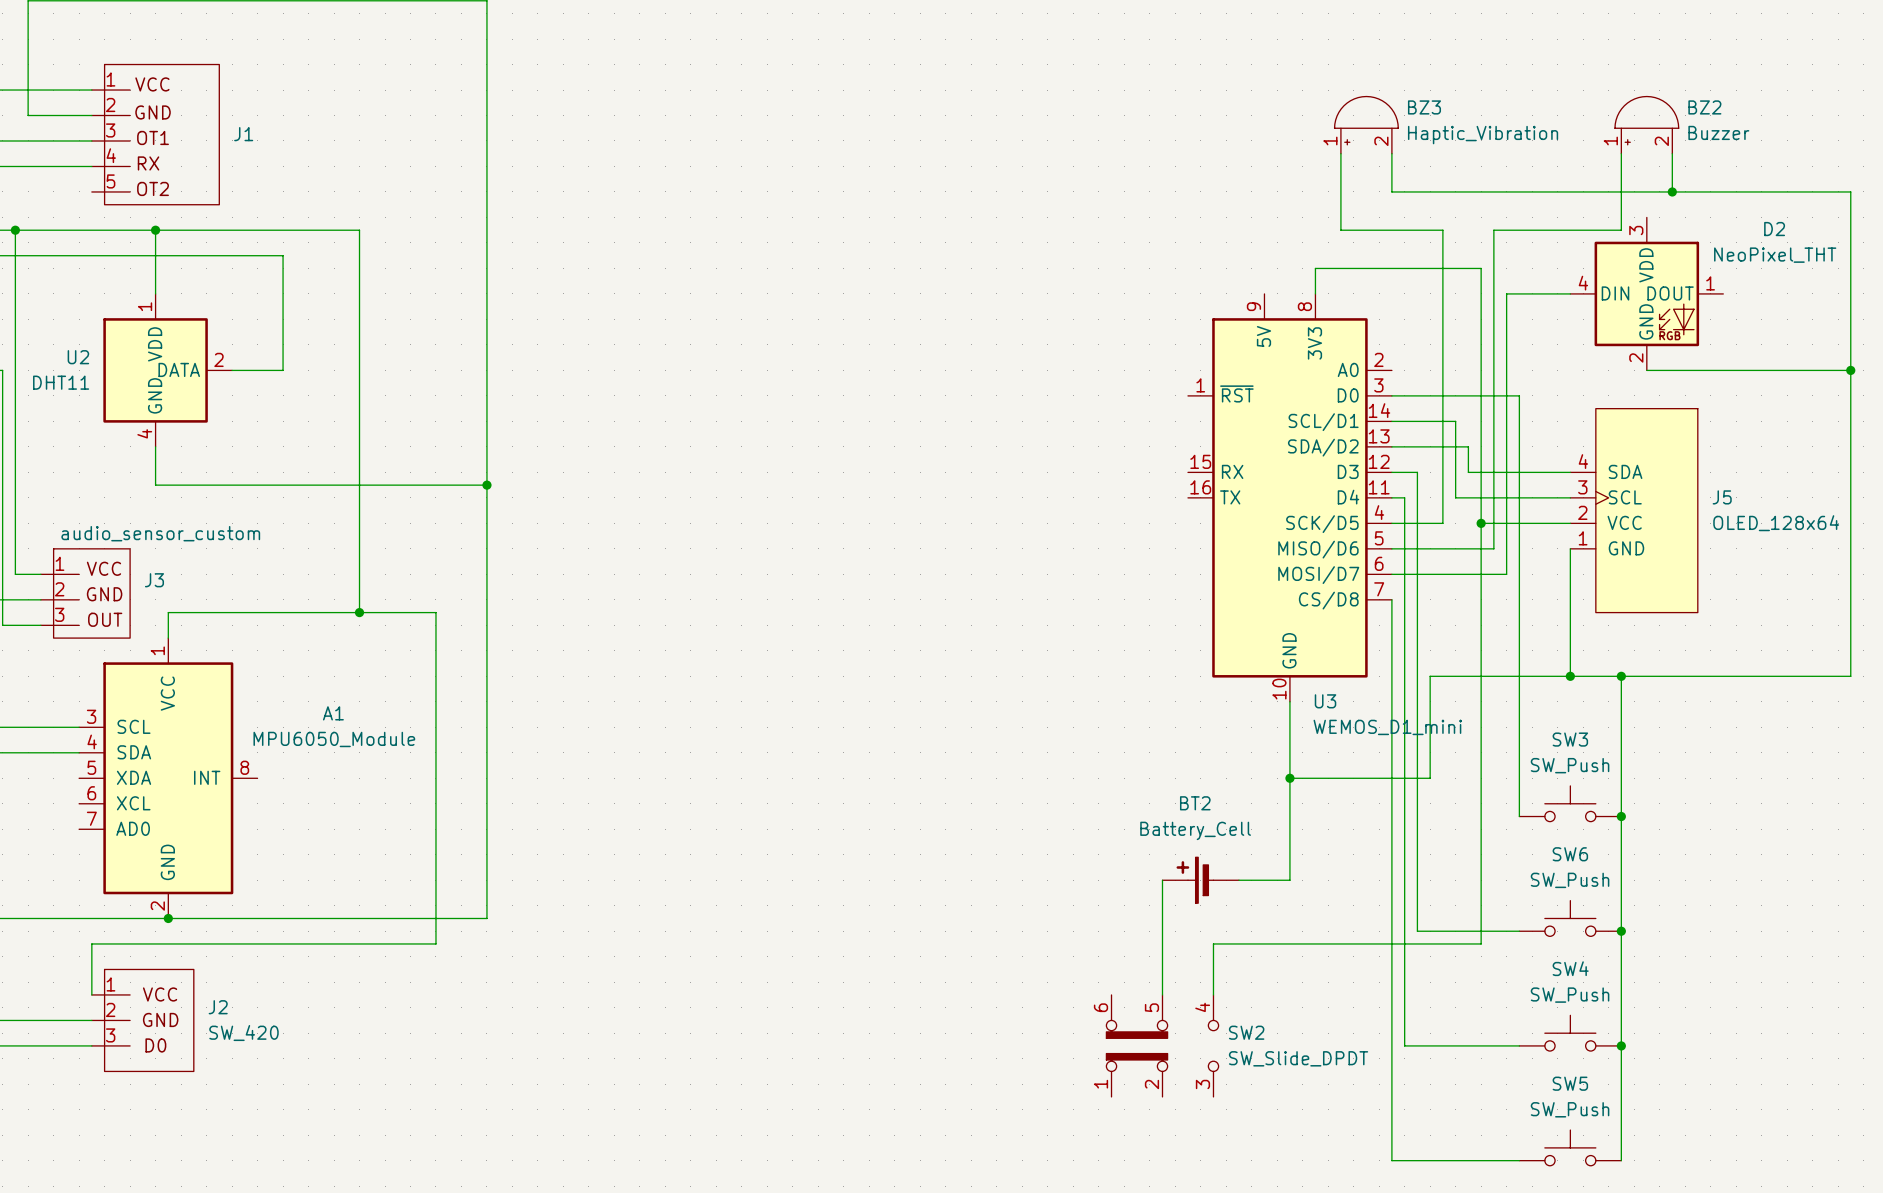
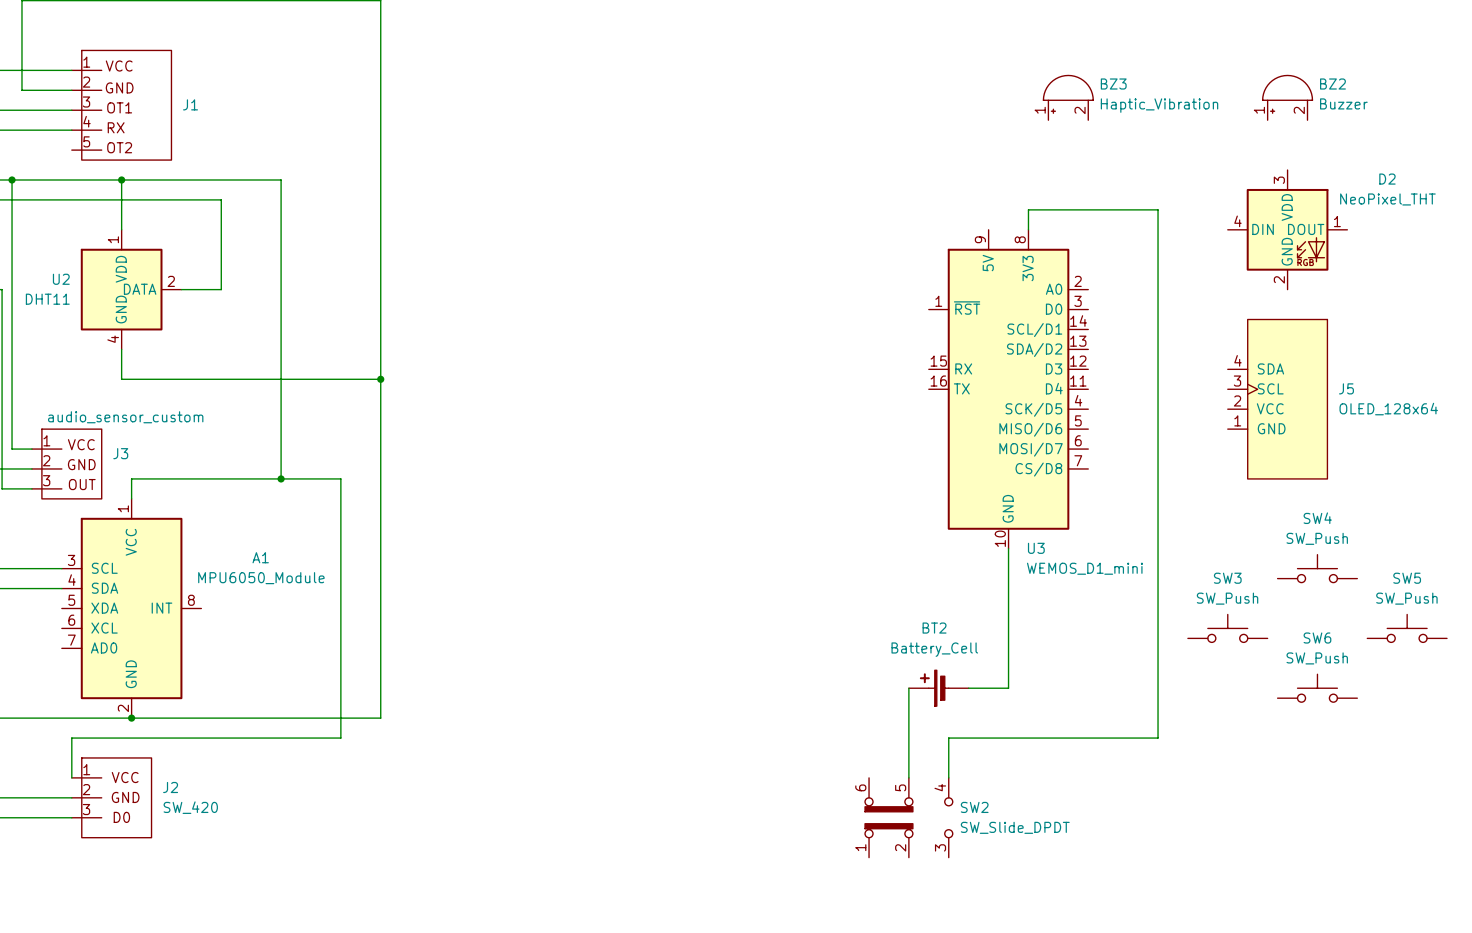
wire: (1340, 153) (1340, 230) (1442, 230) (1442, 523) (1391, 523) -> none
wire: (1391, 153) (1391, 191) (1850, 191) (1850, 676) (1430, 676) (1430, 778) (1289, 778) -> none
wire: (1621, 153) (1621, 230) (1493, 230) (1493, 548) (1391, 548) -> none
wire: (1672, 153) (1672, 191) -> none
junction: (1672, 191) -> none
wire: (1570, 293) (1506, 293) (1506, 574) (1391, 574) -> none
wire: (1646, 370) (1850, 370) -> none
junction: (1850, 370) -> none
wire: (1391, 395) (1519, 395) (1519, 816) -> none
wire: (1391, 421) (1455, 421) (1455, 497) (1570, 497) -> none
wire: (1391, 446) (1468, 446) (1468, 472) (1570, 472) -> none
wire: (1391, 472) (1417, 472) (1417, 931) (1519, 931) -> none
wire: (1391, 497) (1404, 497) (1404, 1045) (1519, 1045) -> none
wire: (1481, 523) (1570, 523) -> none
junction: (1481, 523) -> none
wire: (1570, 548) (1570, 676) -> none
wire: (1391, 599) (1391, 1160) (1519, 1160) -> none
junction: (1570, 676) -> none
wire: (1621, 676) (1621, 1160) -> none
junction: (1621, 676) -> none
junction: (1289, 778) -> none
junction: (1621, 816) -> none
SW6 position: (1570, 918) -> (1317, 688)
junction: (1621, 931) -> none
SW4 position: (1570, 1033) -> (1317, 568)
junction: (1621, 1045) -> none
SW5 position: (1570, 1147) -> (1407, 628)

